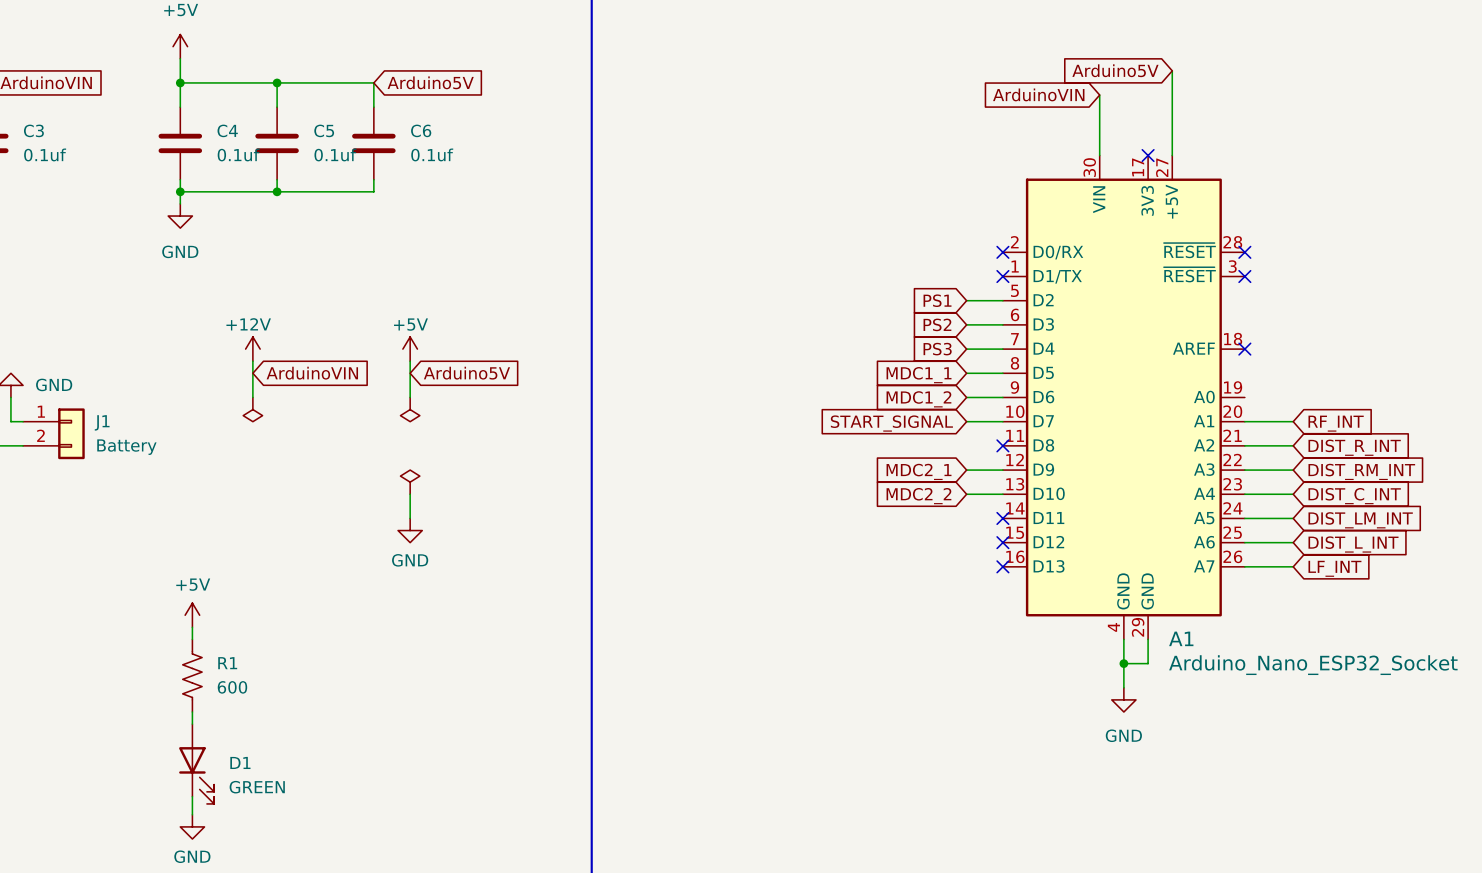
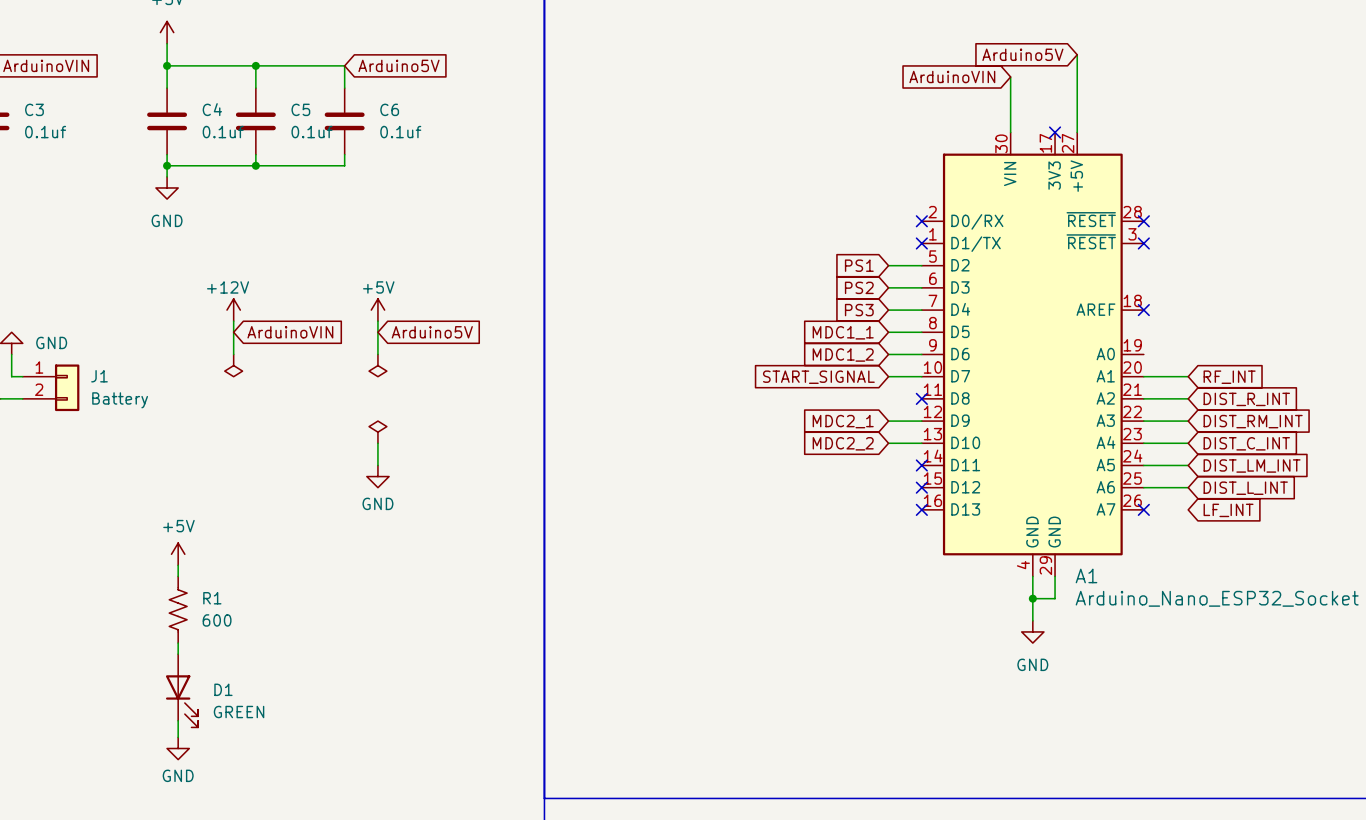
wire: (1244, 566) (1293, 566) -> none
no-connect mark: none -> (1143, 509)

